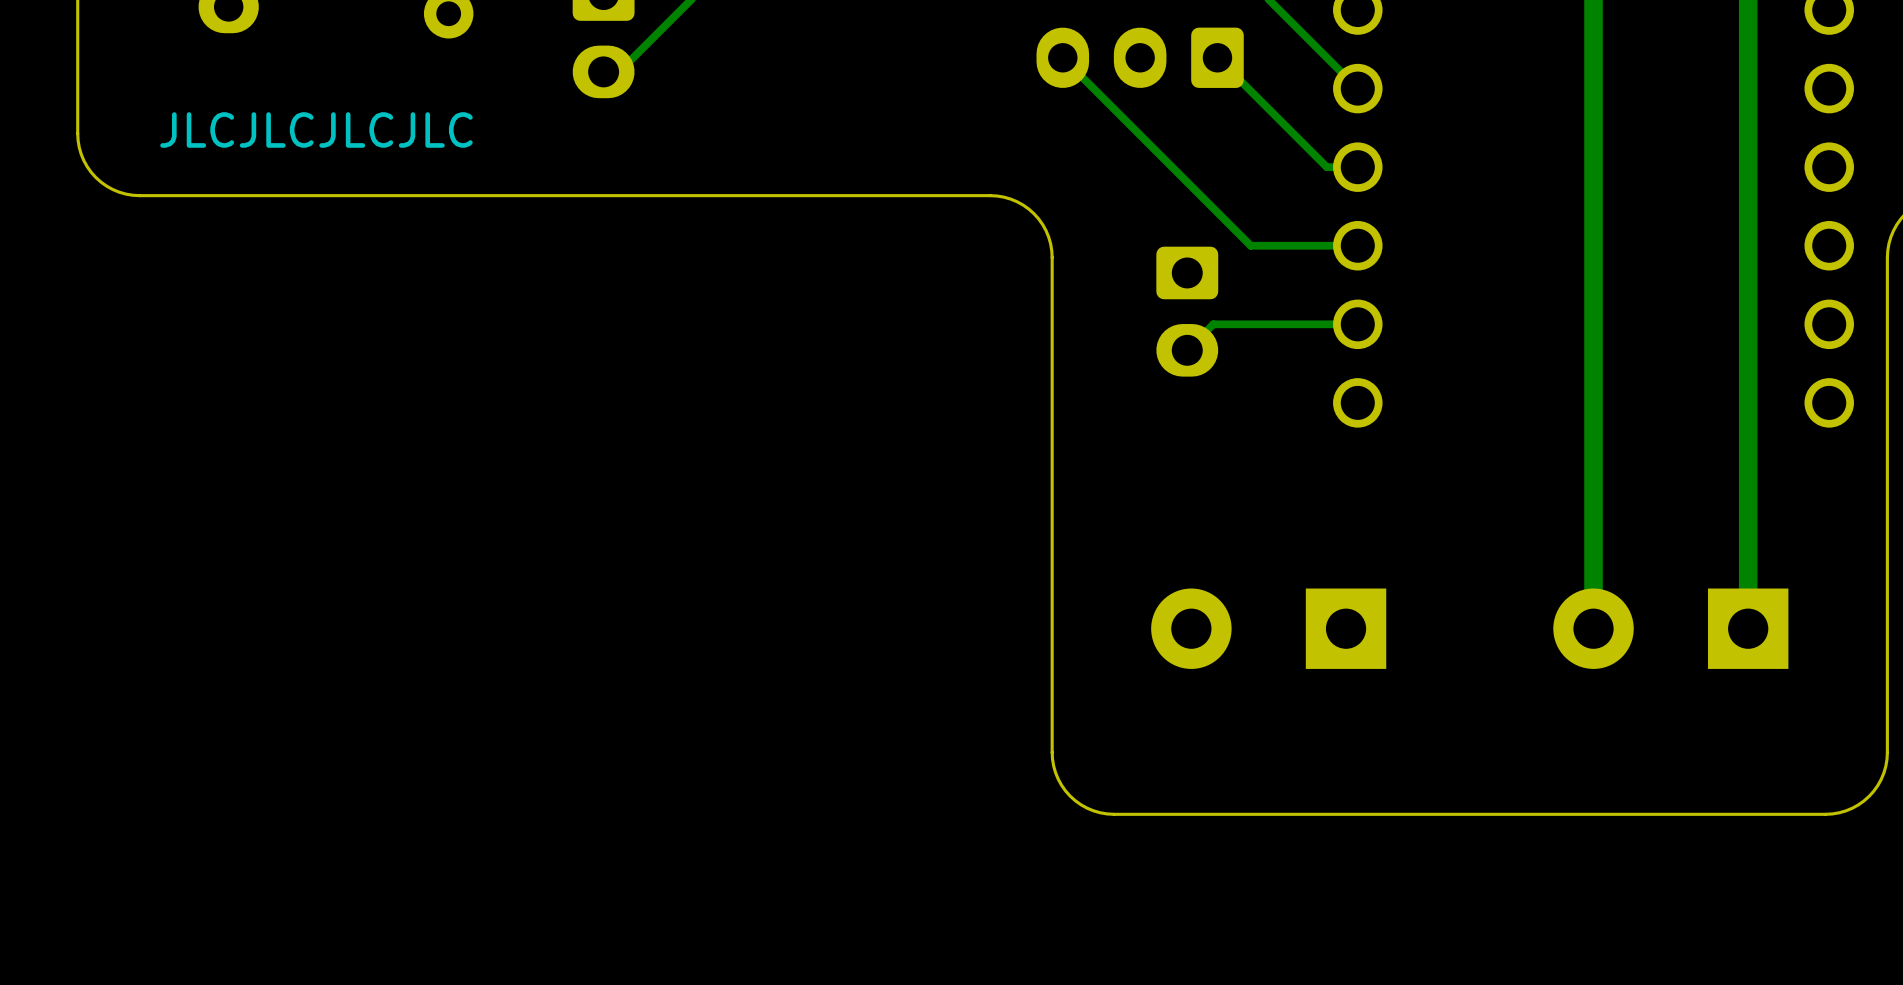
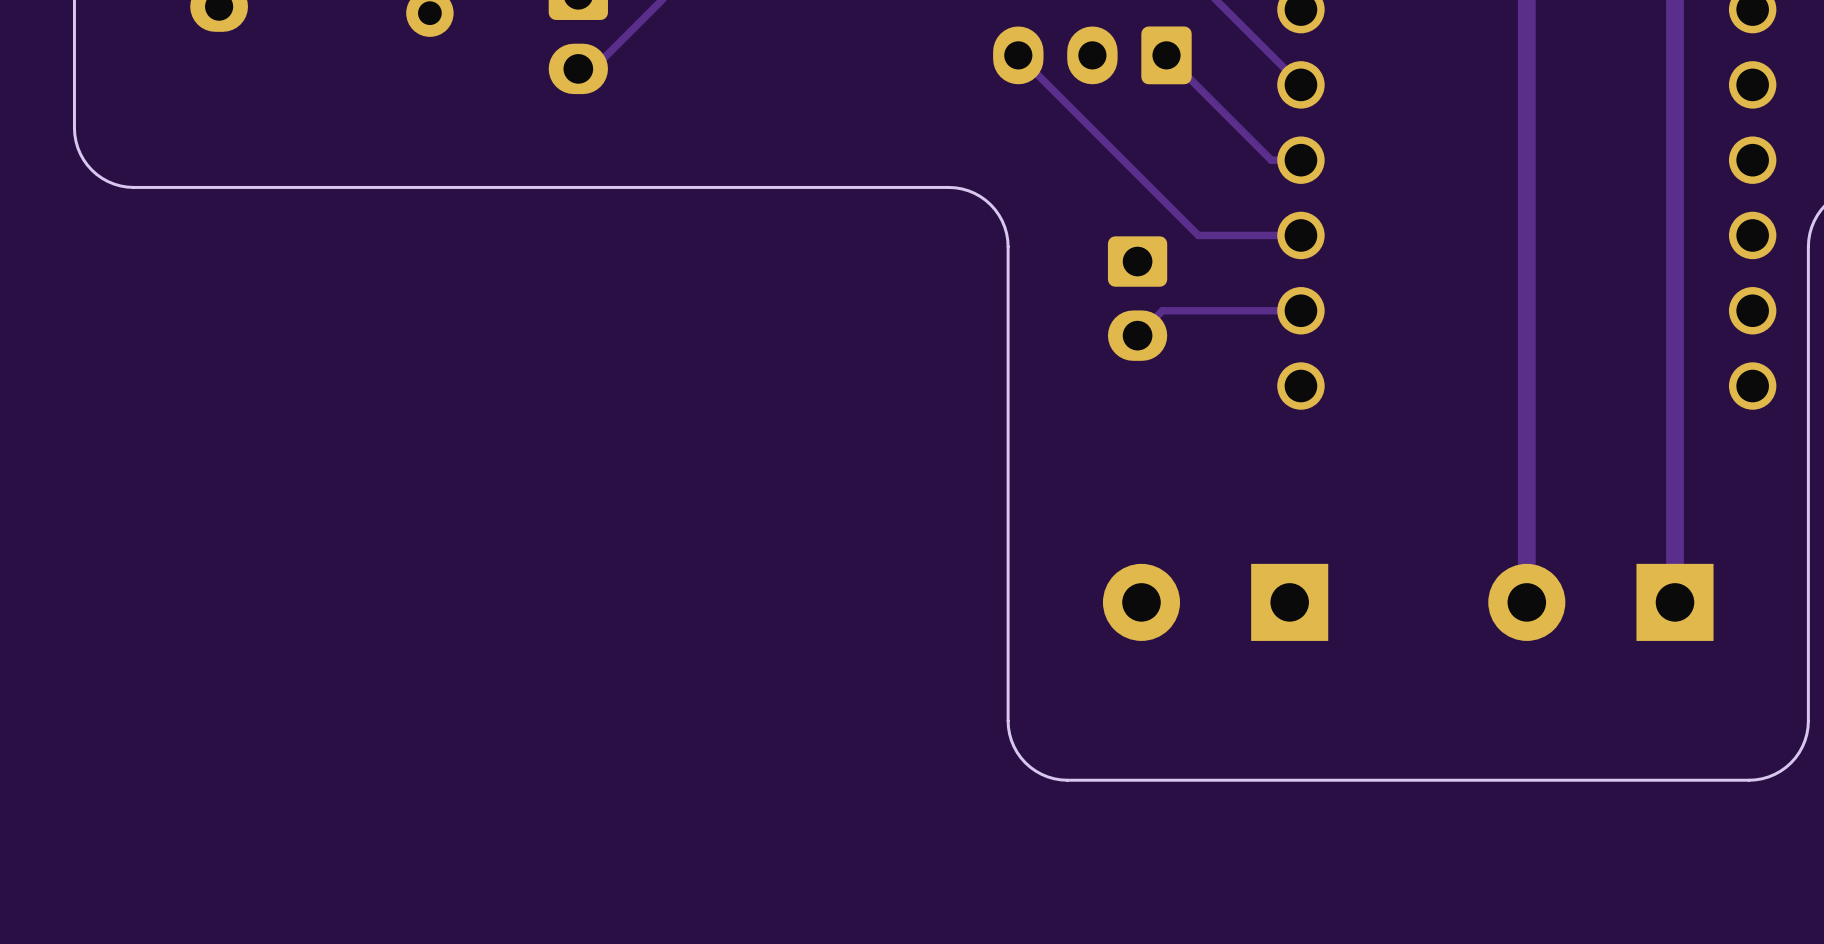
text: JLCJLCJLCJLC (316, 129) -> none

